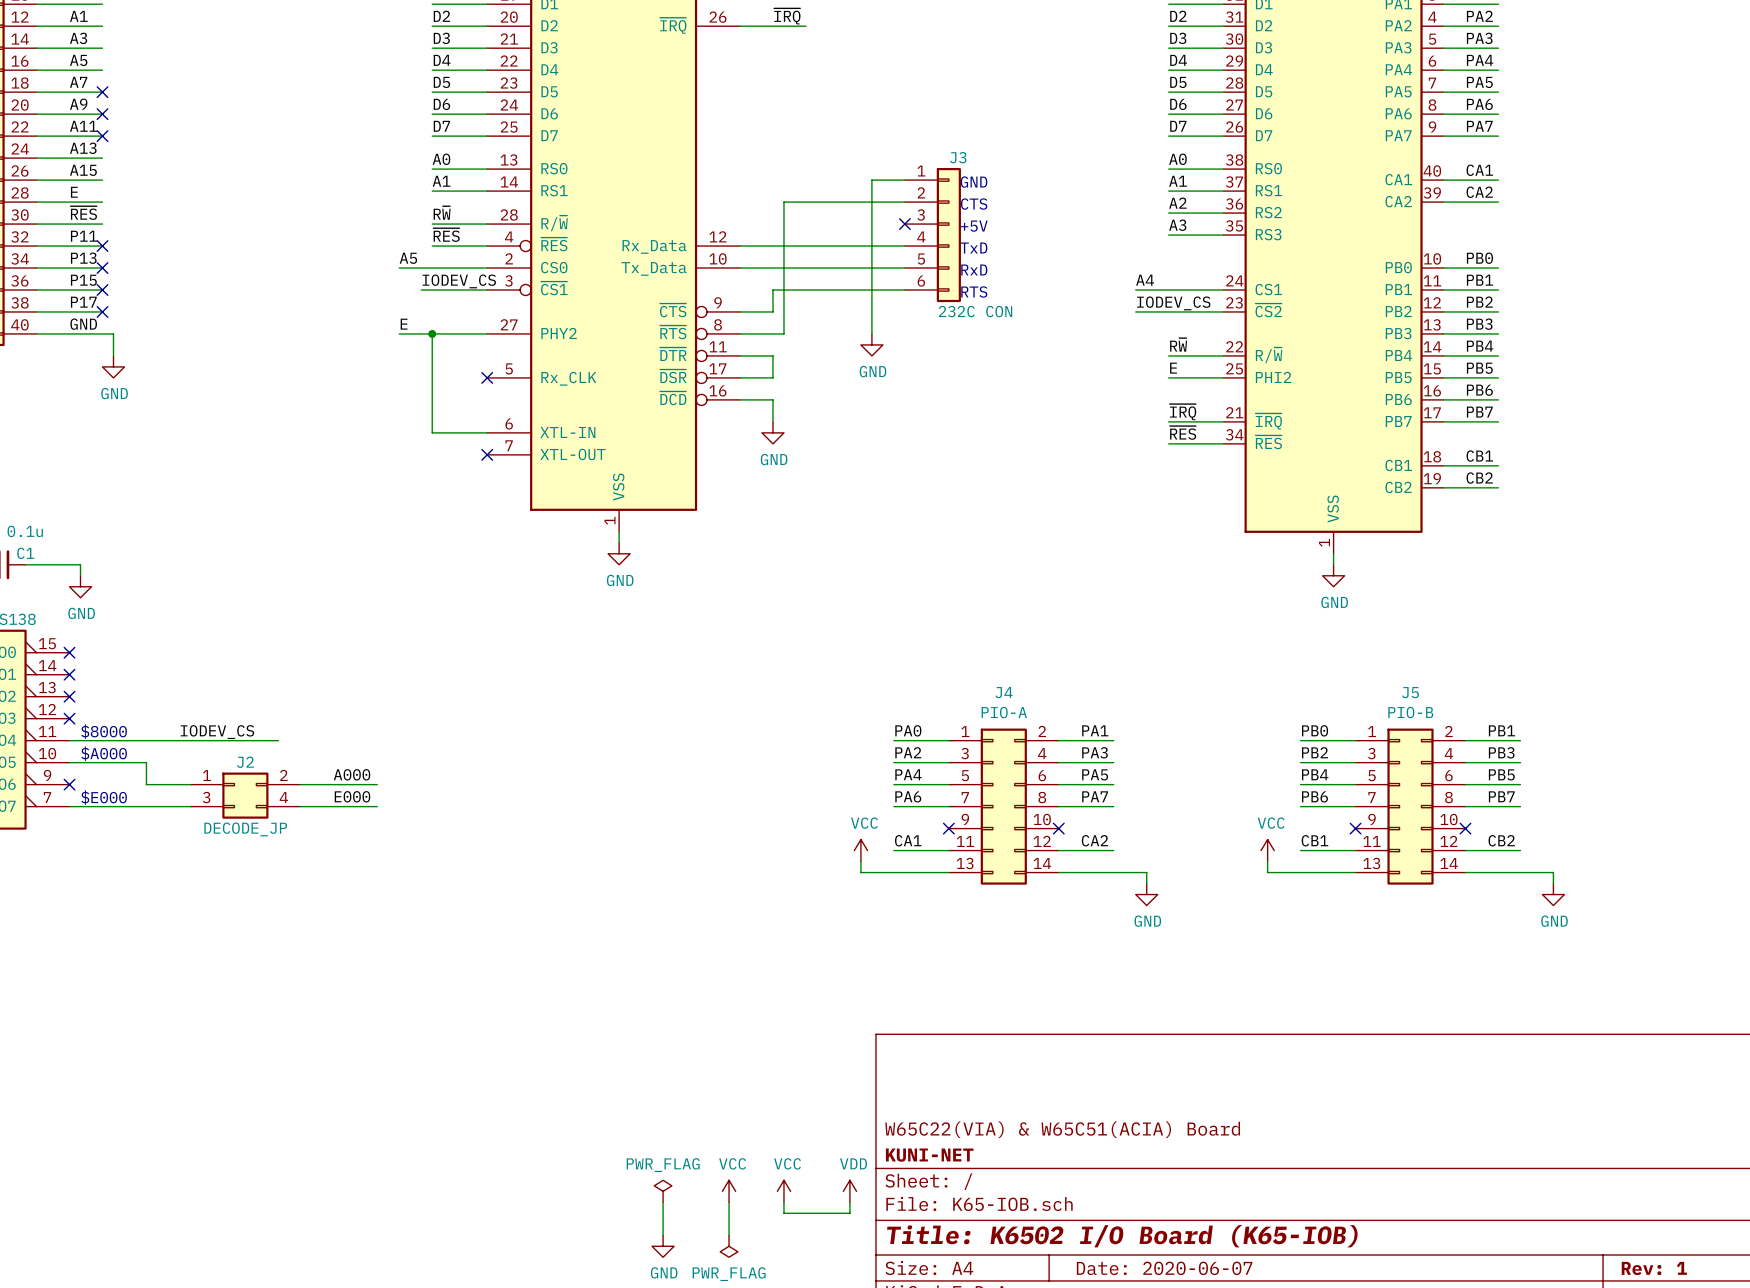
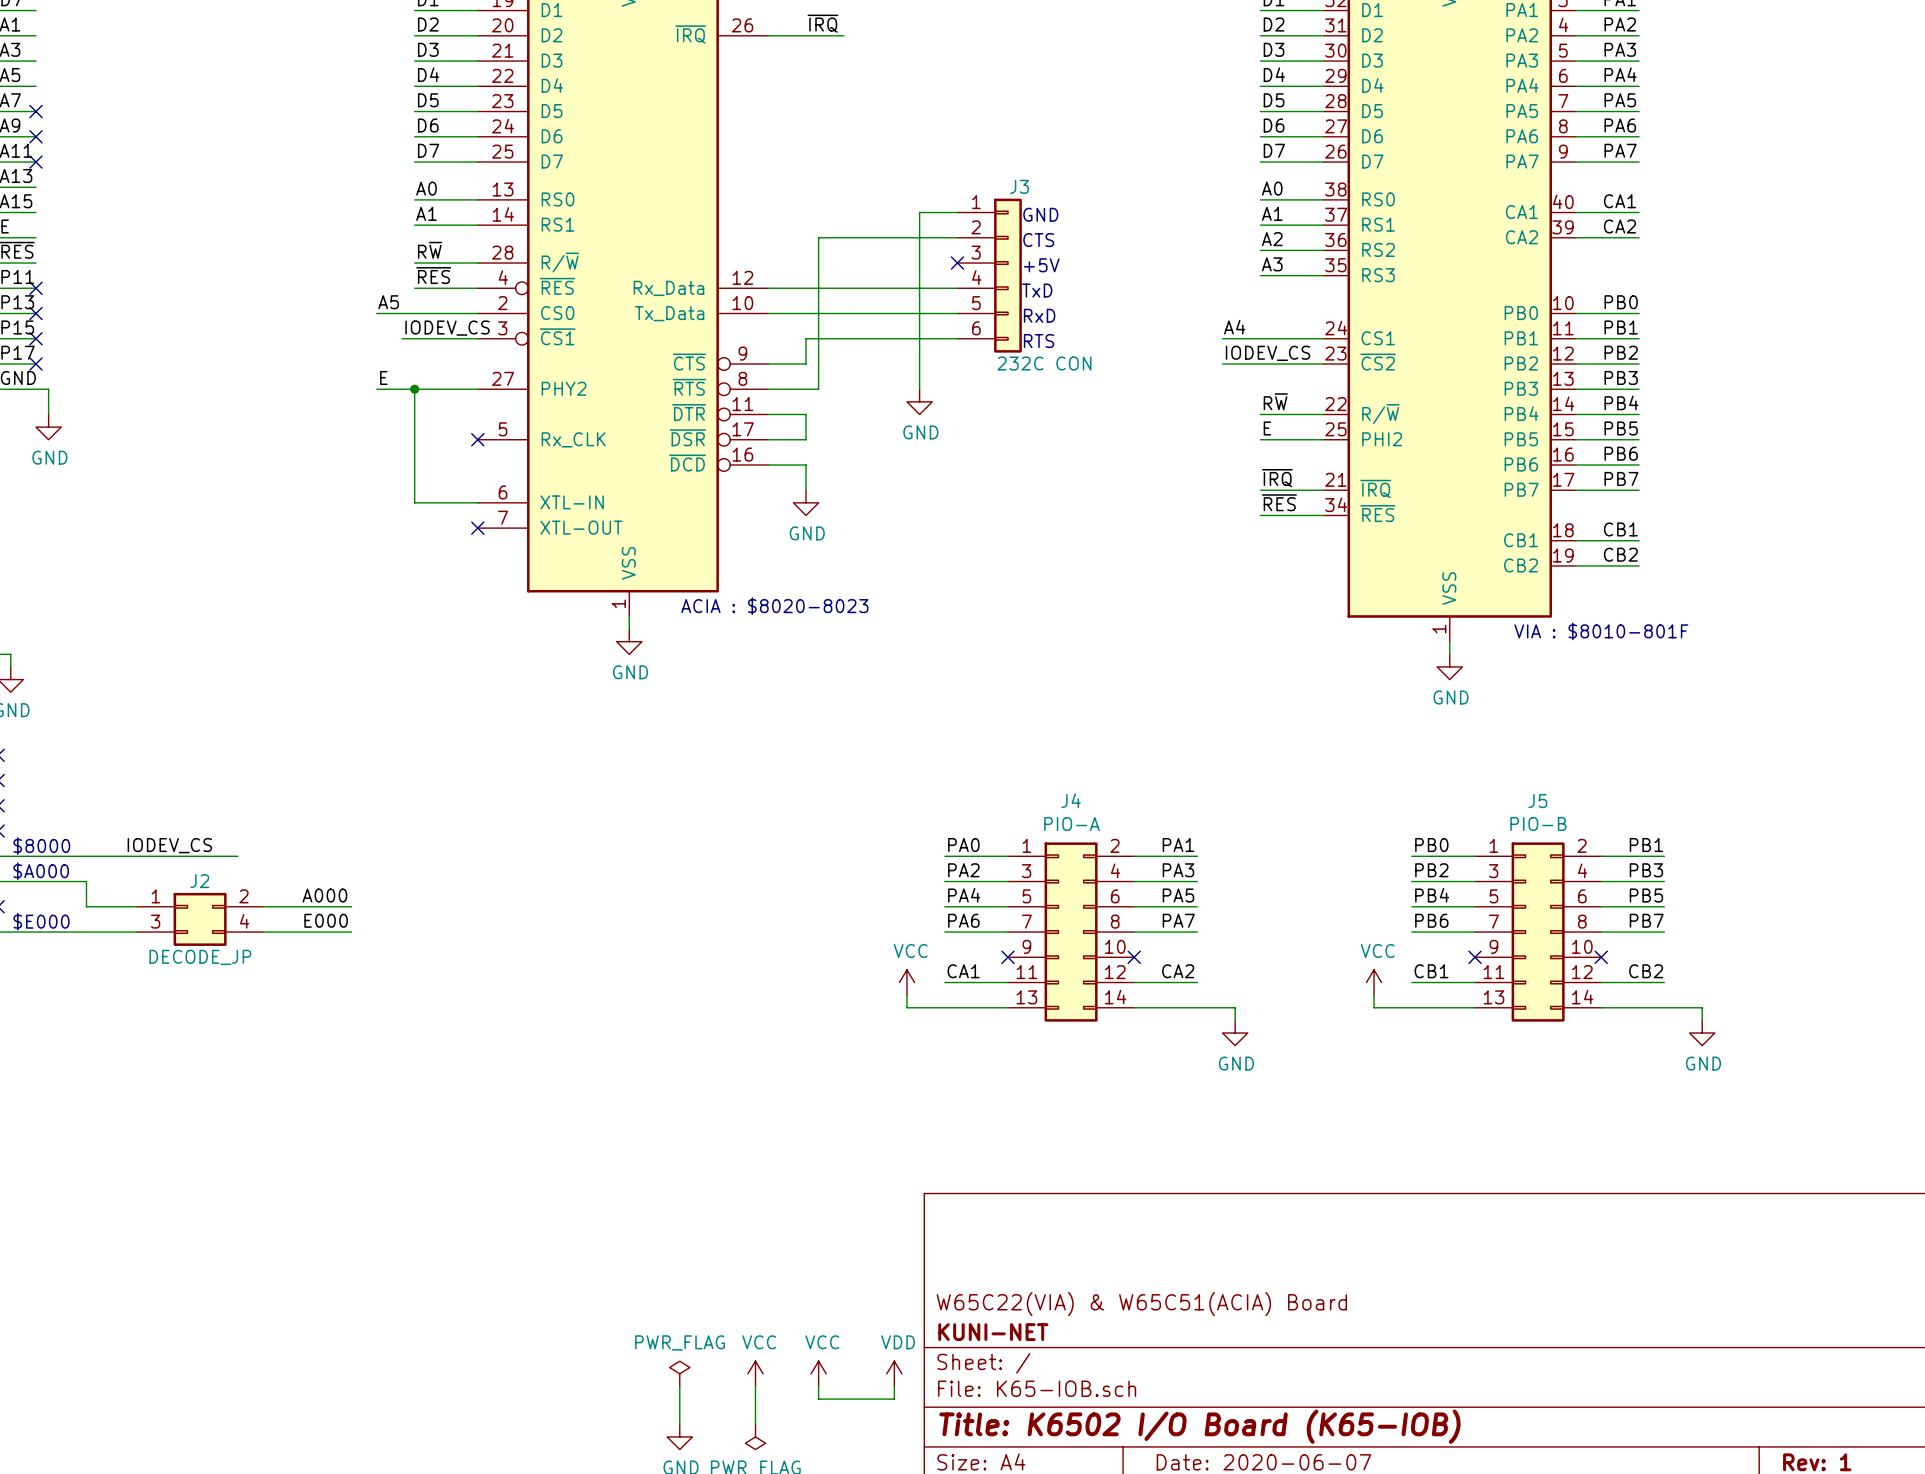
text: none -> ACIA : $8020-8023 (774, 606)
text: none -> VIA : $8010-801F (1601, 631)

